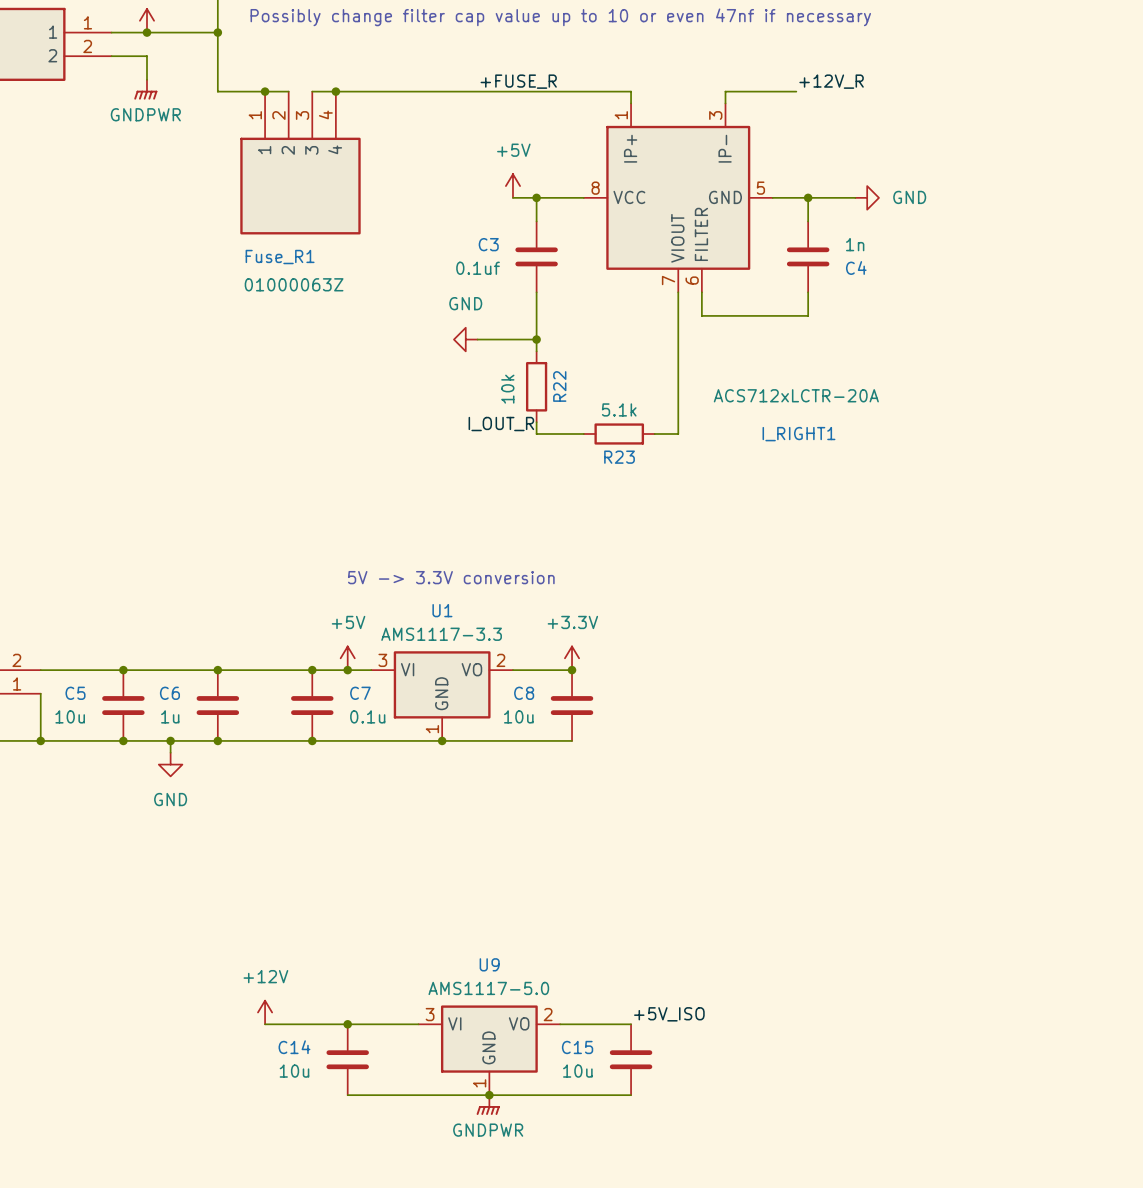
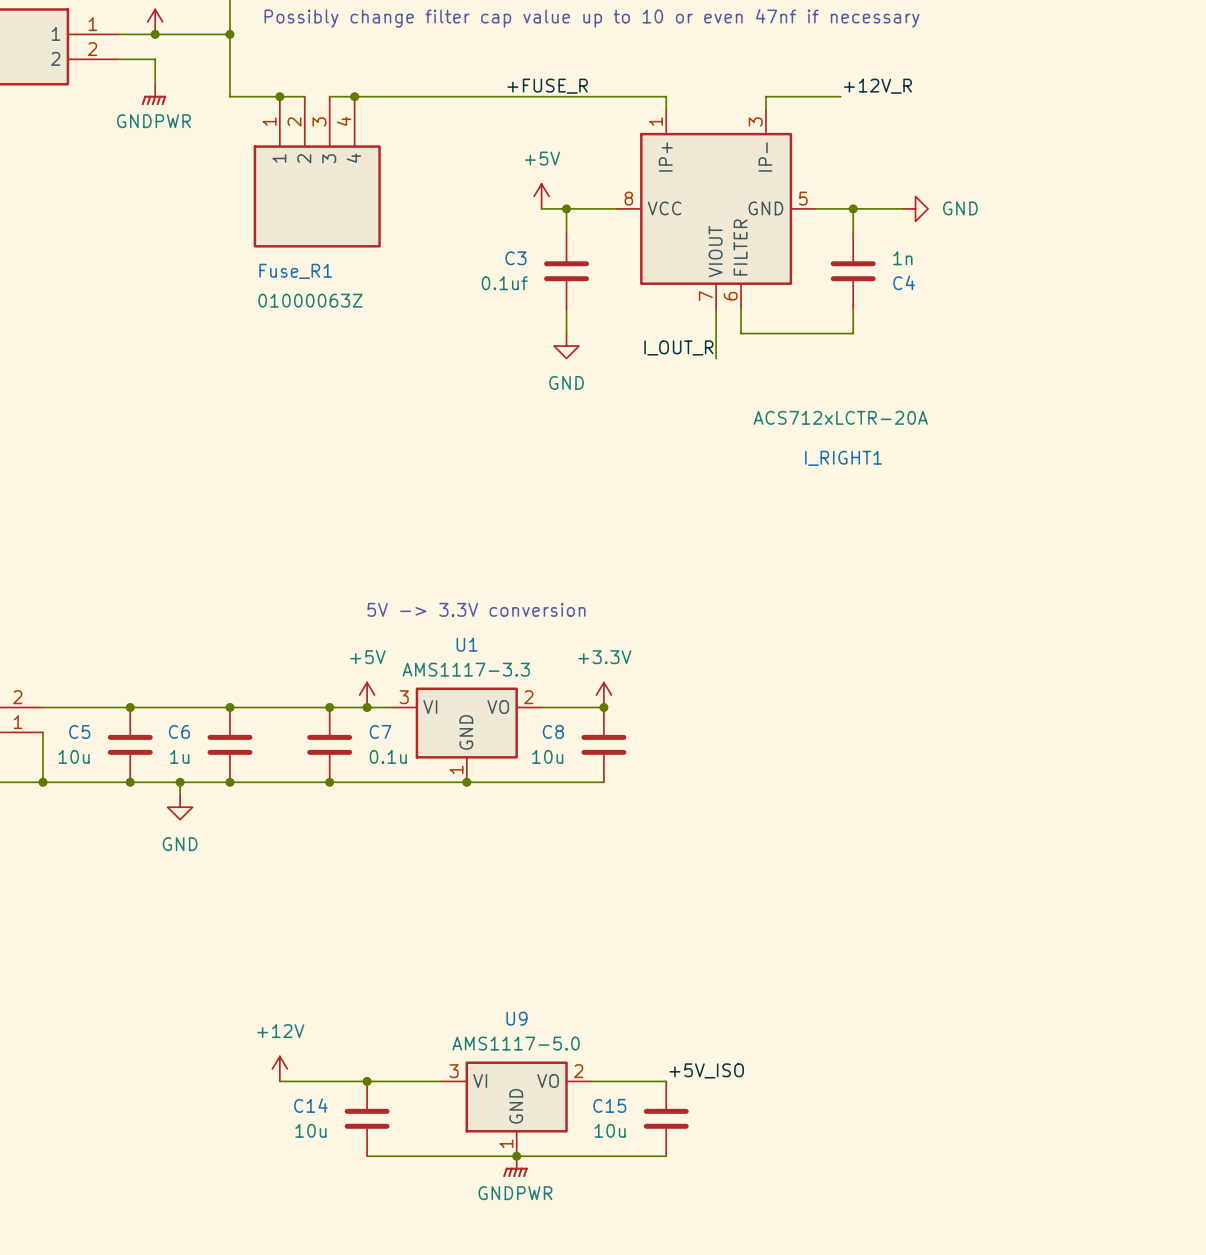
power symbol text position: GND (465, 303) -> GND (566, 382)
wire: (536, 315) (536, 351) -> none
power symbol rotation: 0° (465, 339) -> 90° counterclockwise (566, 346)
power symbol position: GND (465, 339) -> GND (566, 346)
wire: (477, 339) (536, 339) -> none
junction: (536, 339) -> none
wire: (678, 339) (678, 433) (654, 433) -> none
R22: 10k (536, 386) -> none
wire: (536, 422) (536, 433) (583, 433) -> none
label position: I_OUT_R (501, 424) -> I_OUT_R (678, 347)
R23: 5.1k (619, 433) -> none

